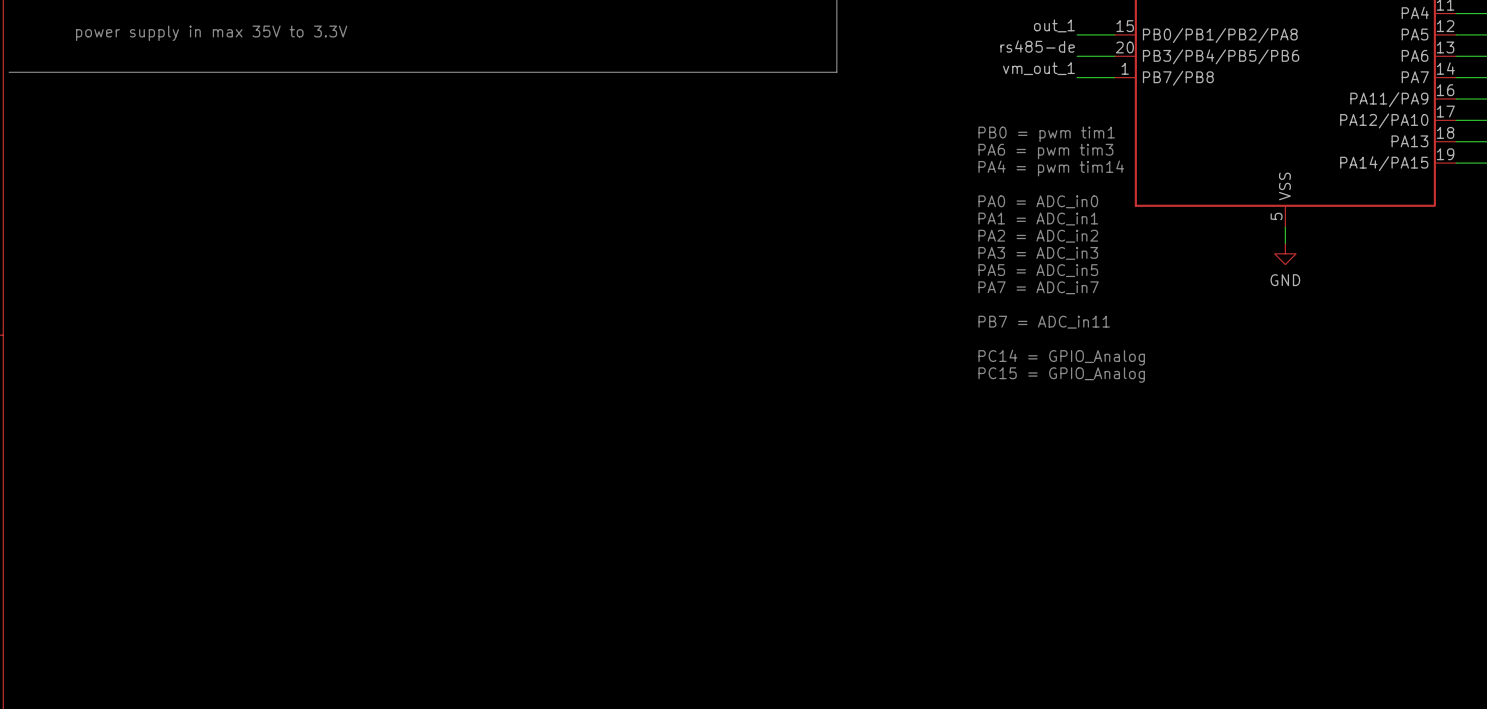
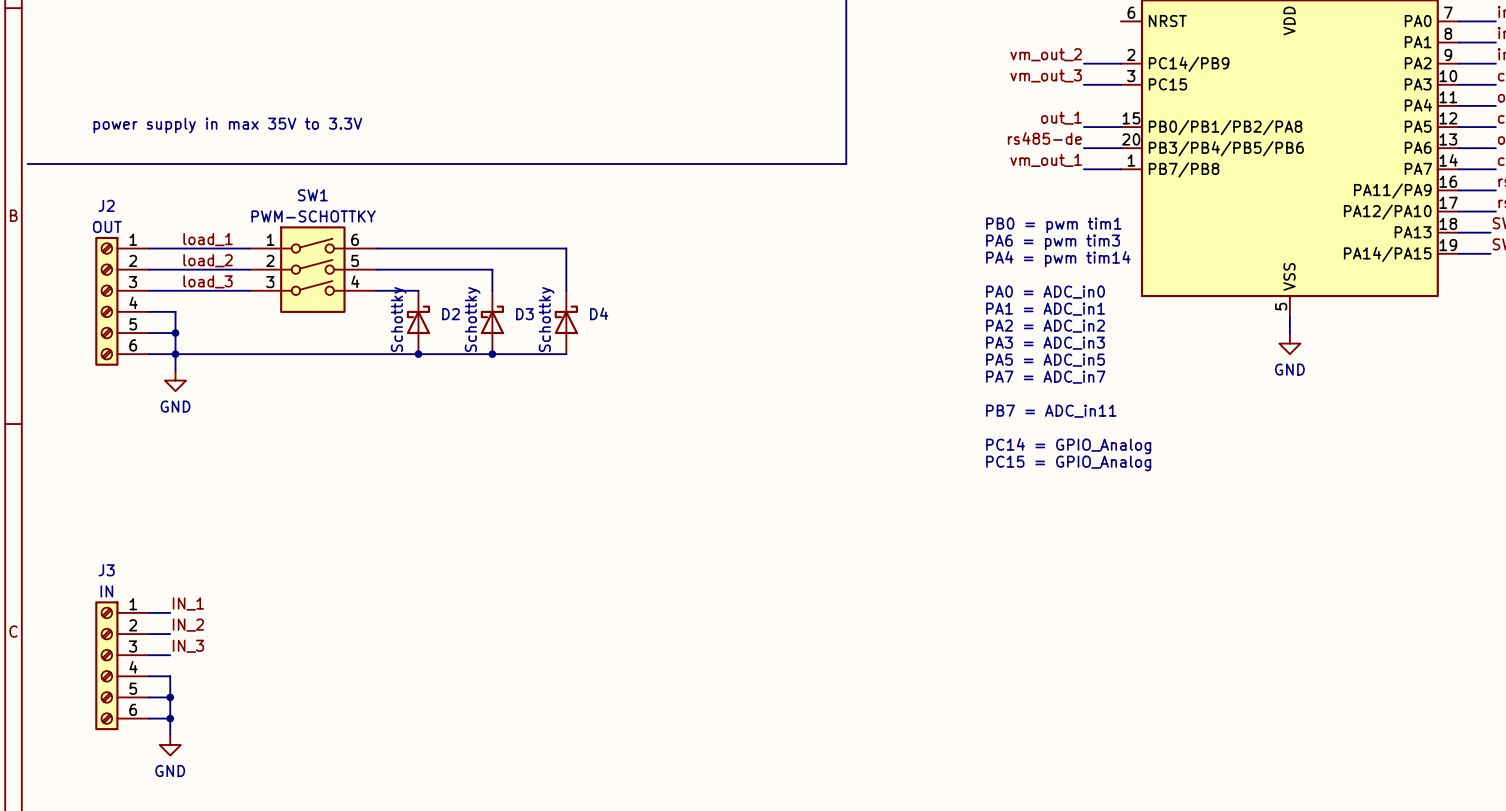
label: none -> load_1 (208, 239)
wire: none -> (149, 248) (249, 248)
wire: none -> (376, 248) (566, 248) (566, 290)
label: none -> load_2 (208, 260)
wire: none -> (149, 269) (249, 269)
SW1: none -> PWM-SCHOTTKY (312, 269)
wire: none -> (376, 269) (492, 269) (492, 290)
label: none -> load_3 (208, 281)
wire: none -> (149, 290) (249, 290)
wire: none -> (376, 290) (418, 290)
J2: none -> OUT (122, 301)
wire: none -> (149, 311) (175, 311) (175, 369)
D2: none -> Schottky (418, 322)
D3: none -> Schottky (492, 322)
D4: none -> Schottky (566, 322)
wire: none -> (149, 333) (175, 333)
junction: none -> (175, 333)
wire: none -> (149, 354) (566, 354)
junction: none -> (175, 354)
junction: none -> (418, 354)
junction: none -> (492, 354)
power symbol: none -> GND (175, 380)
label: none -> IN_1 (188, 604)
wire: none -> (149, 612) (170, 612)
label: none -> IN_2 (188, 625)
wire: none -> (149, 634) (170, 634)
label: none -> IN_3 (188, 646)
wire: none -> (149, 655) (170, 655)
J3: none -> IN (122, 665)
wire: none -> (149, 676) (170, 676) (170, 734)
wire: none -> (149, 697) (170, 697)
junction: none -> (170, 697)
wire: none -> (149, 718) (170, 718)
junction: none -> (170, 718)
power symbol: none -> GND (170, 744)

